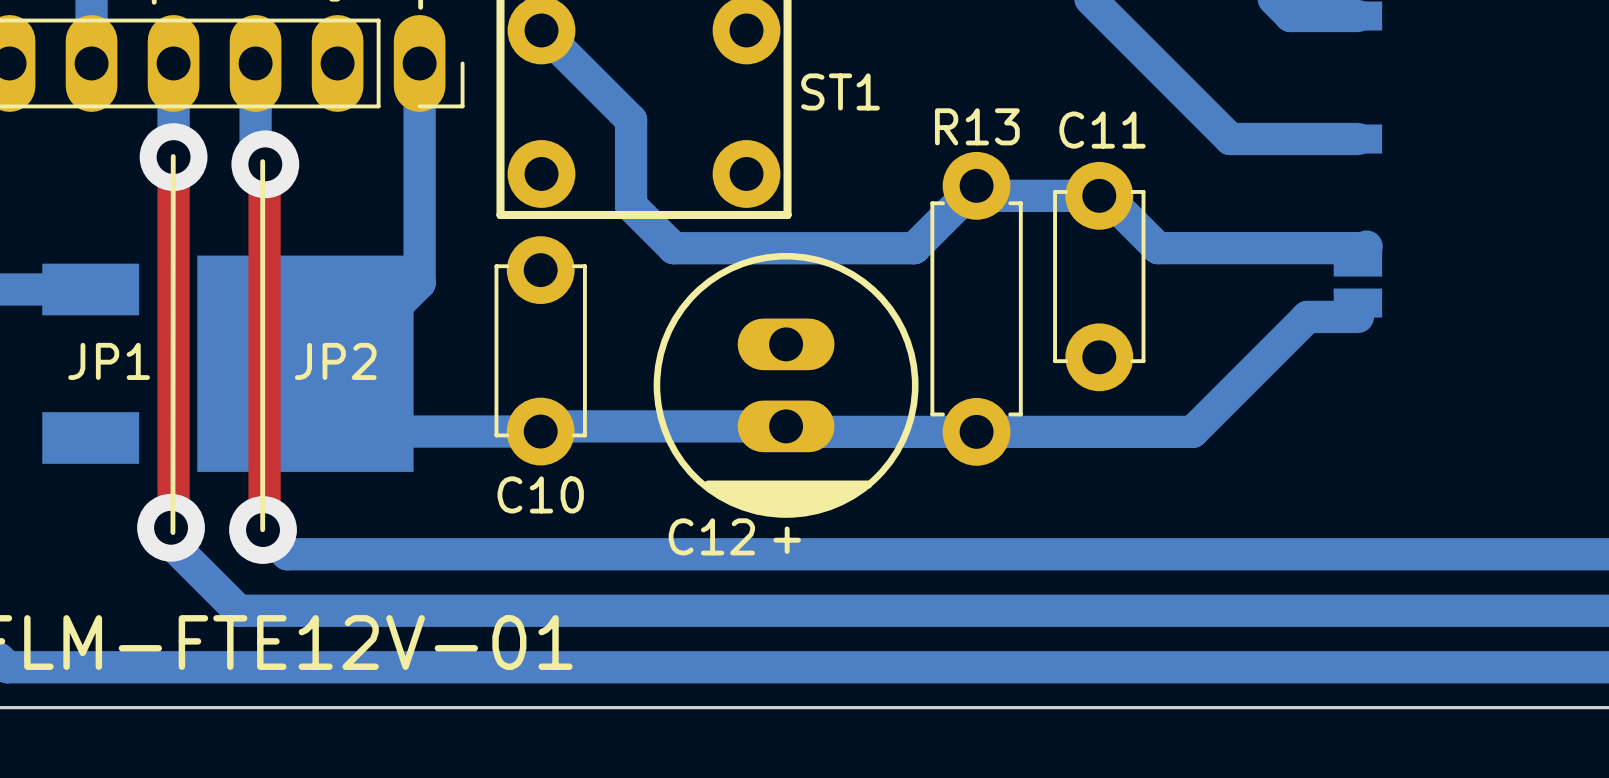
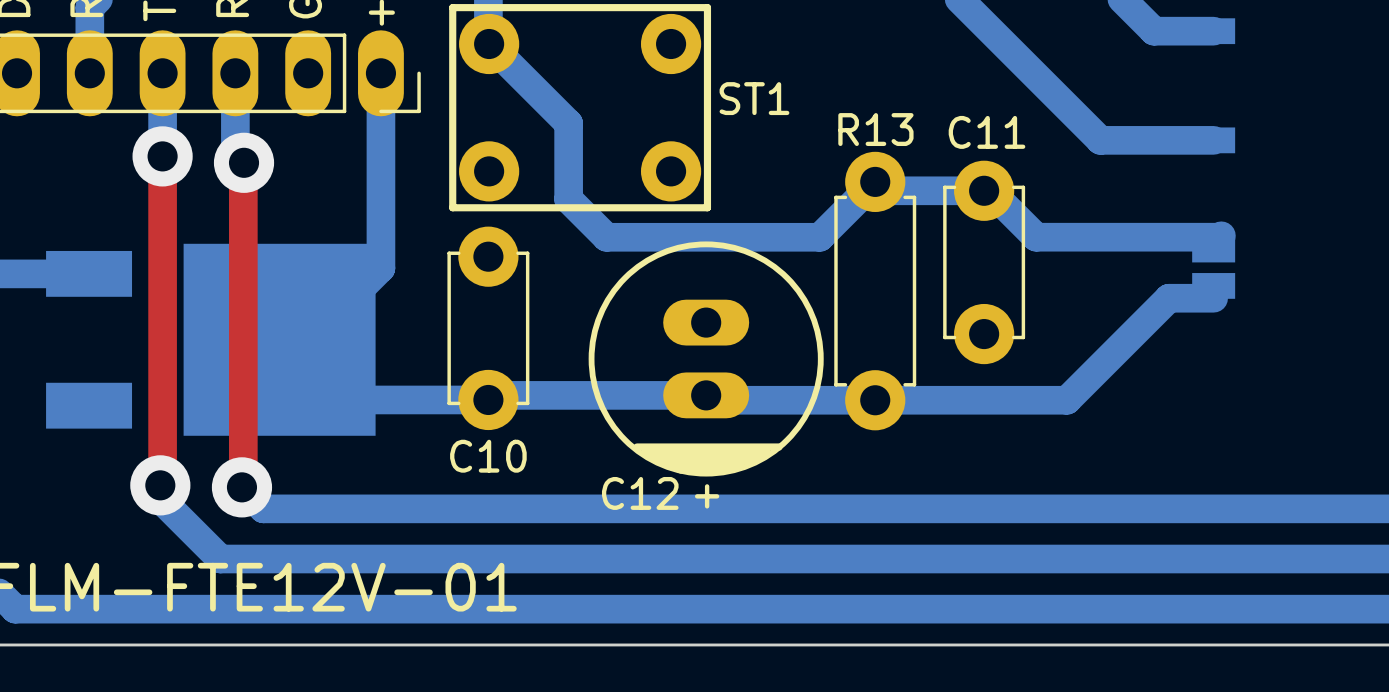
line: (173, 156) (172, 532) -> none
line: (262, 161) (262, 529) -> none
text: JP1 (109, 361) -> none
text: JP2 (335, 361) -> none

